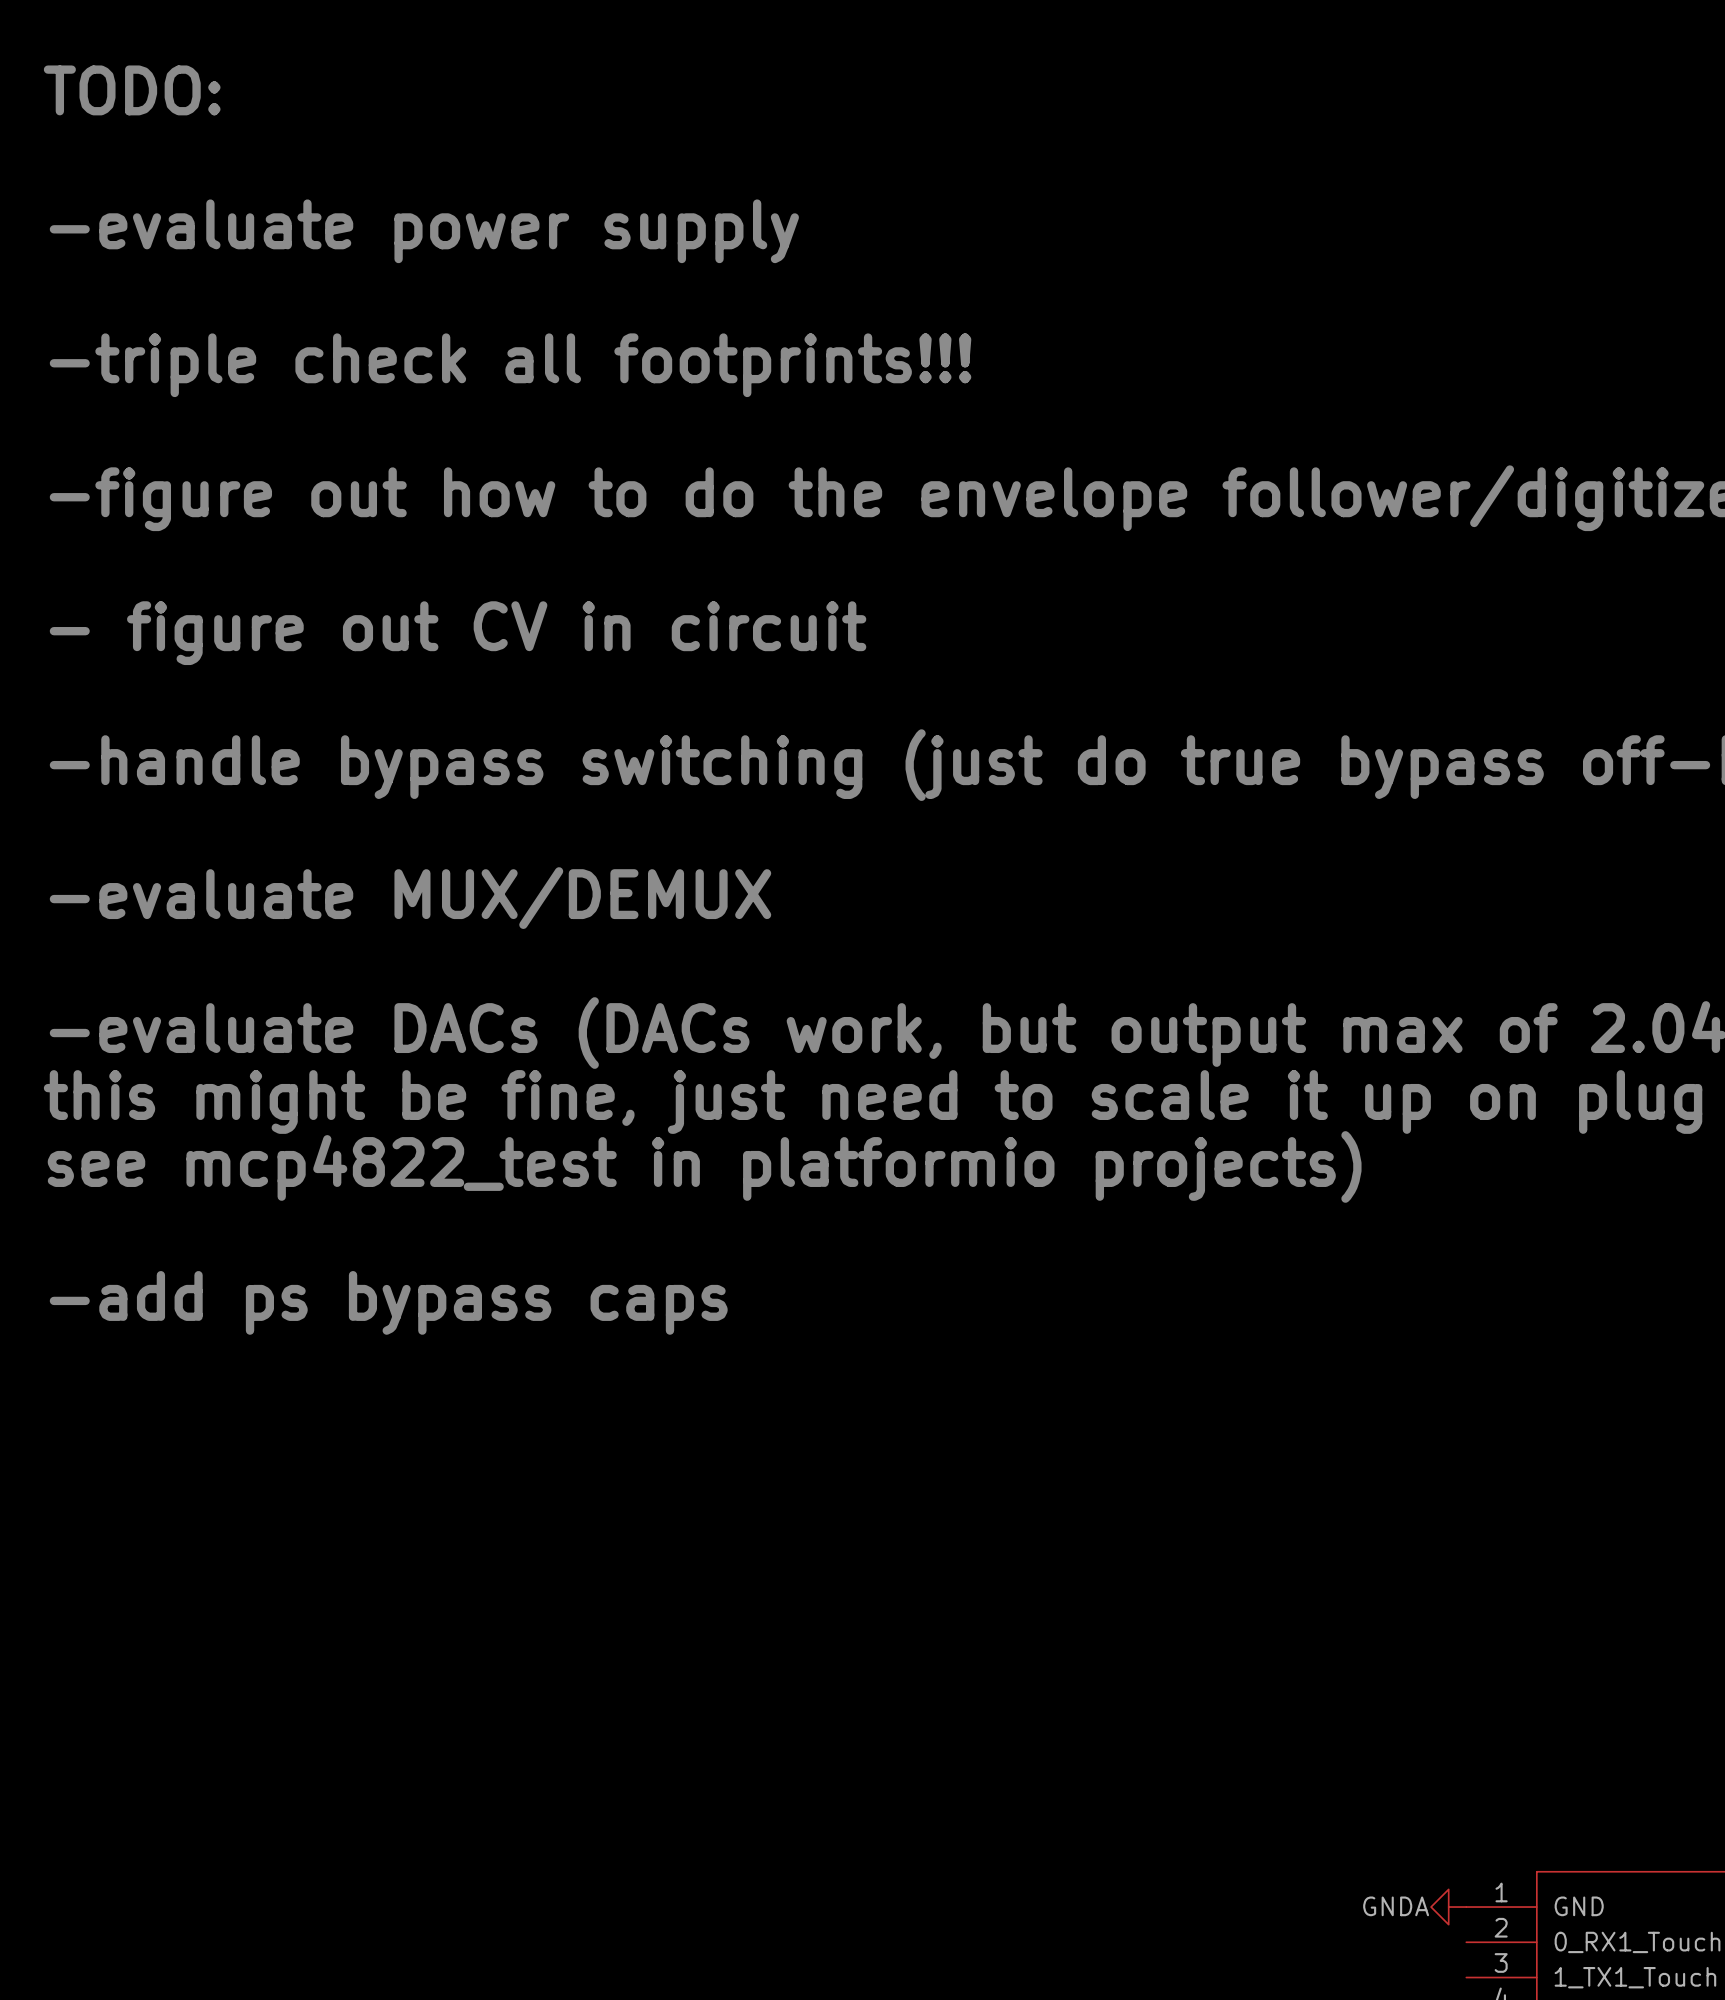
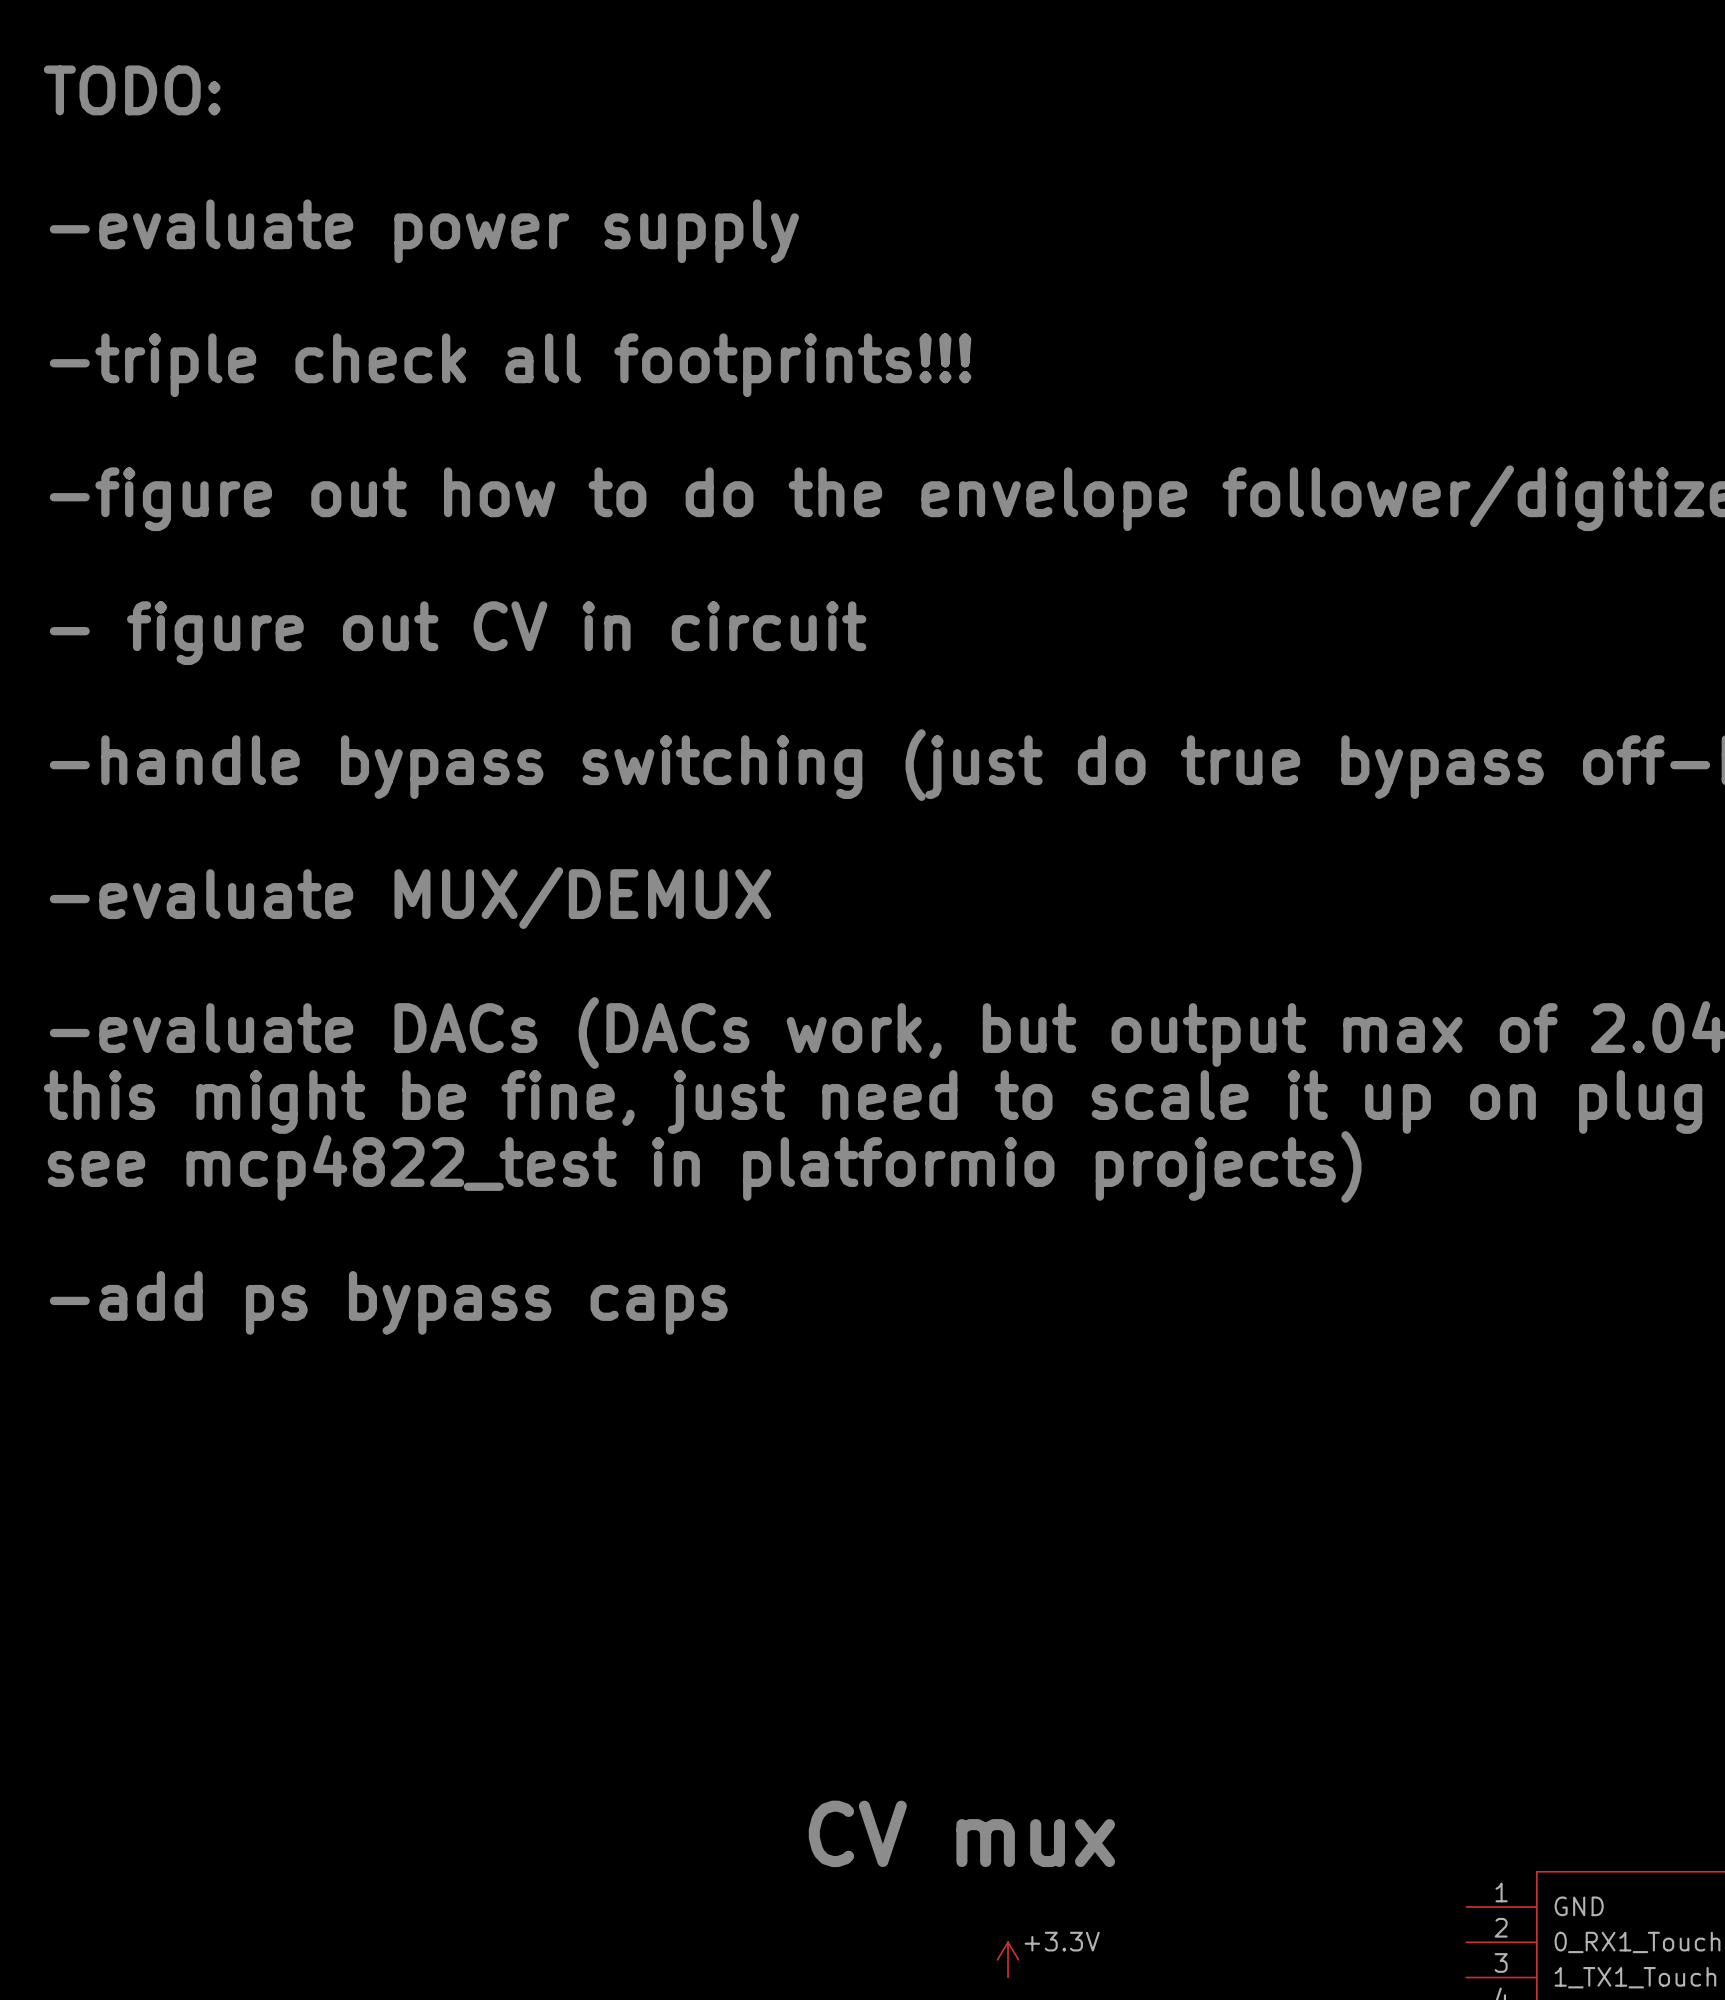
text: none -> CV mux (961, 1833)
power symbol: GNDA (1448, 1907) -> none
power symbol: none -> +3.3V (1008, 1959)

